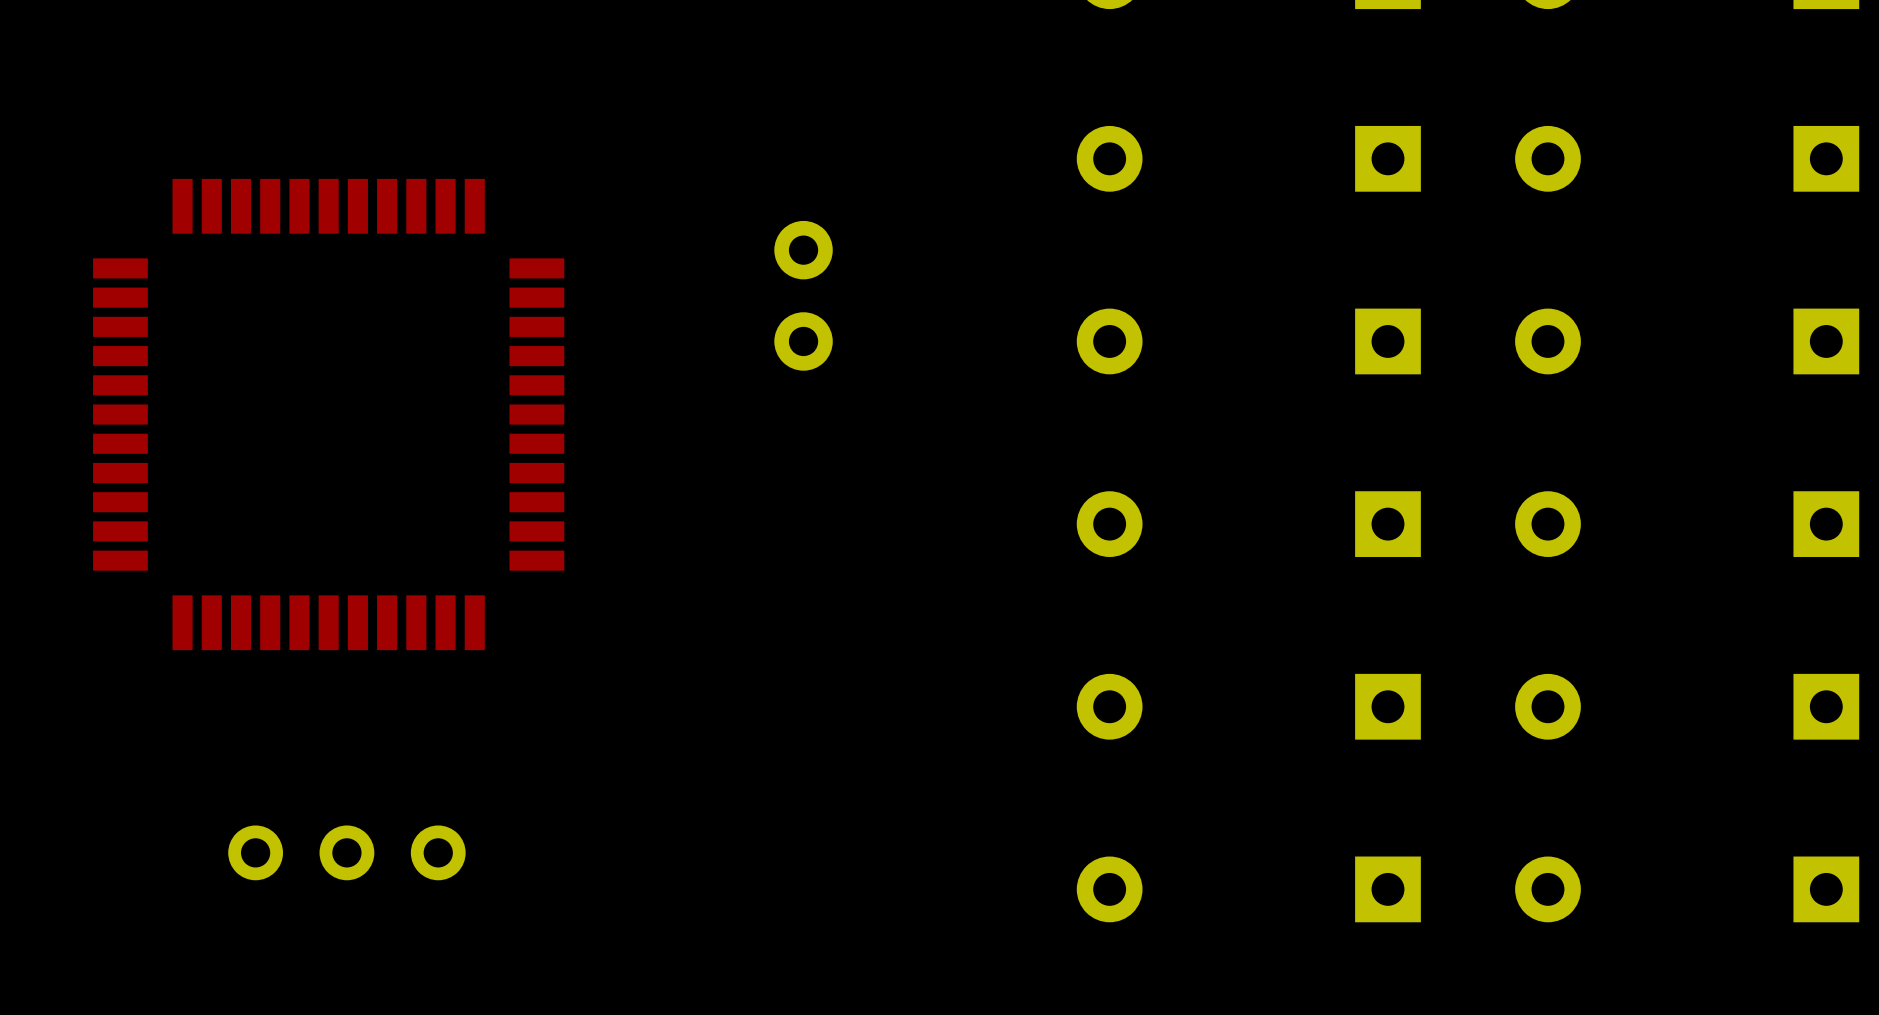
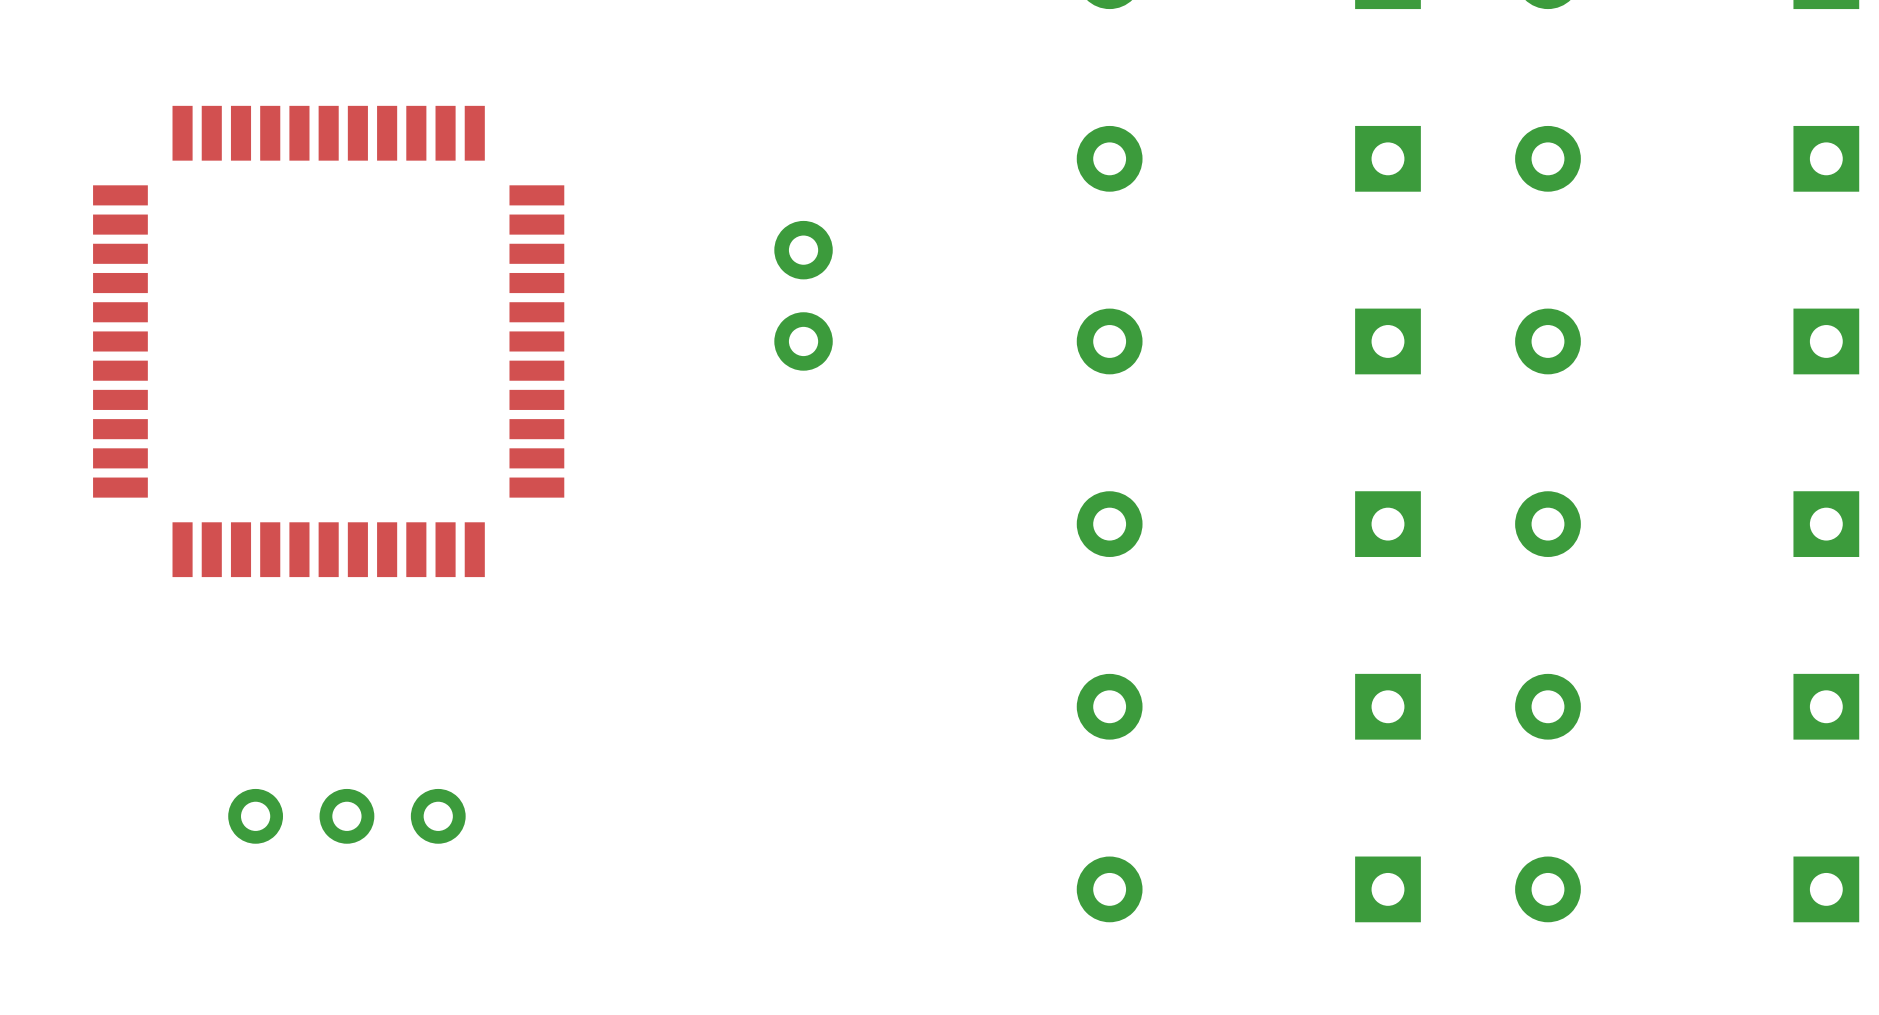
part position: (328, 414) -> (328, 341)
part position: (346, 852) -> (346, 816)

